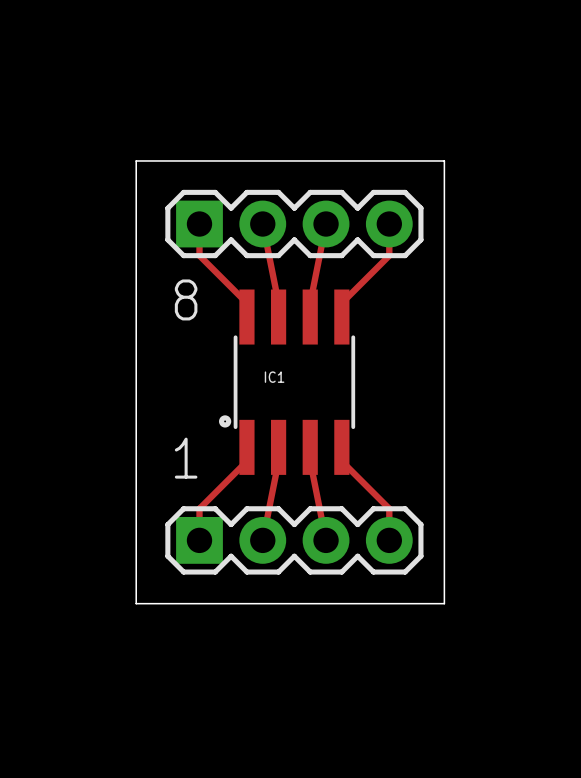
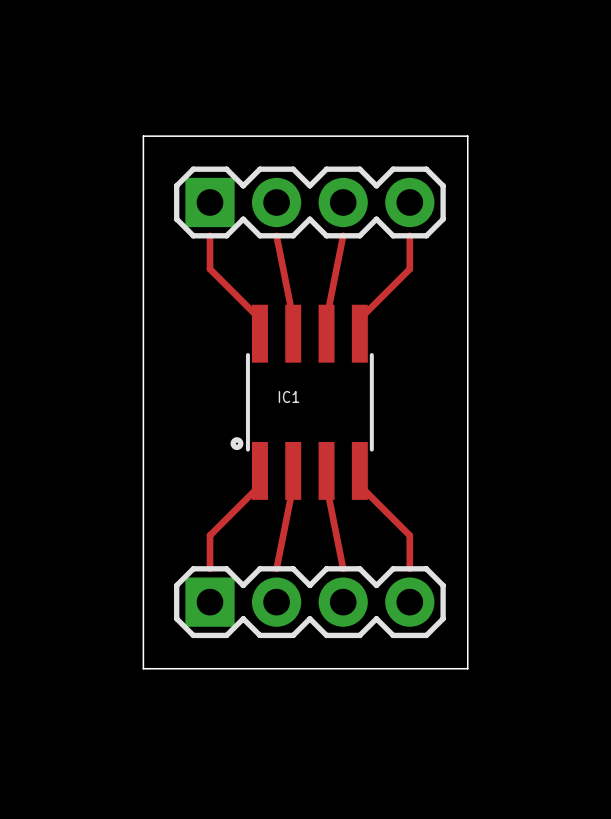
board edge: (136, 160) (444, 160) -> (143, 169) (143, 136) (467, 136) (467, 169)
part position: (294, 224) -> (309, 202)
text: 8 (186, 299) -> none
text: 1 (186, 458) -> none
part position: (294, 540) -> (309, 602)
board edge: (136, 603) (444, 603) -> (143, 635) (143, 668) (467, 668) (467, 635)

